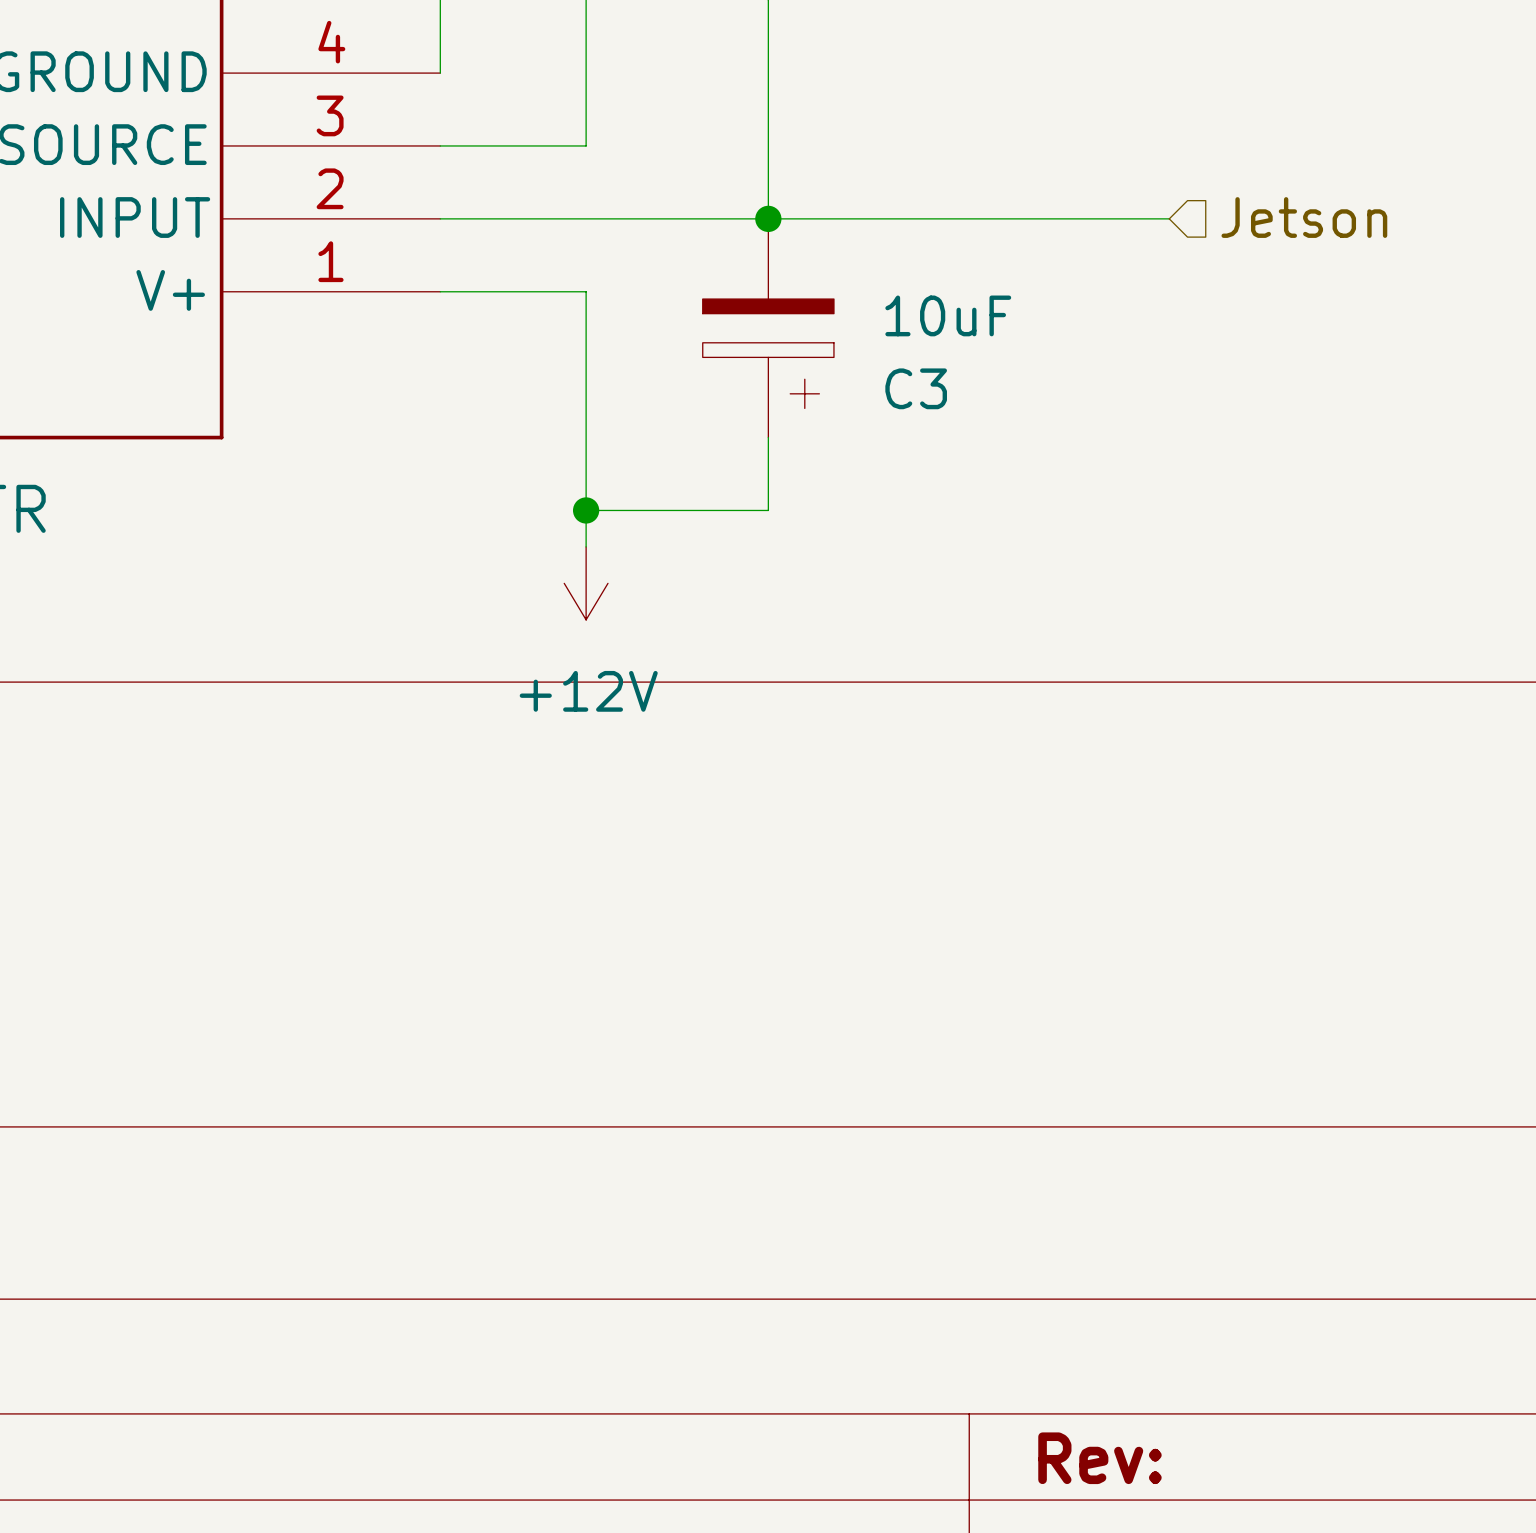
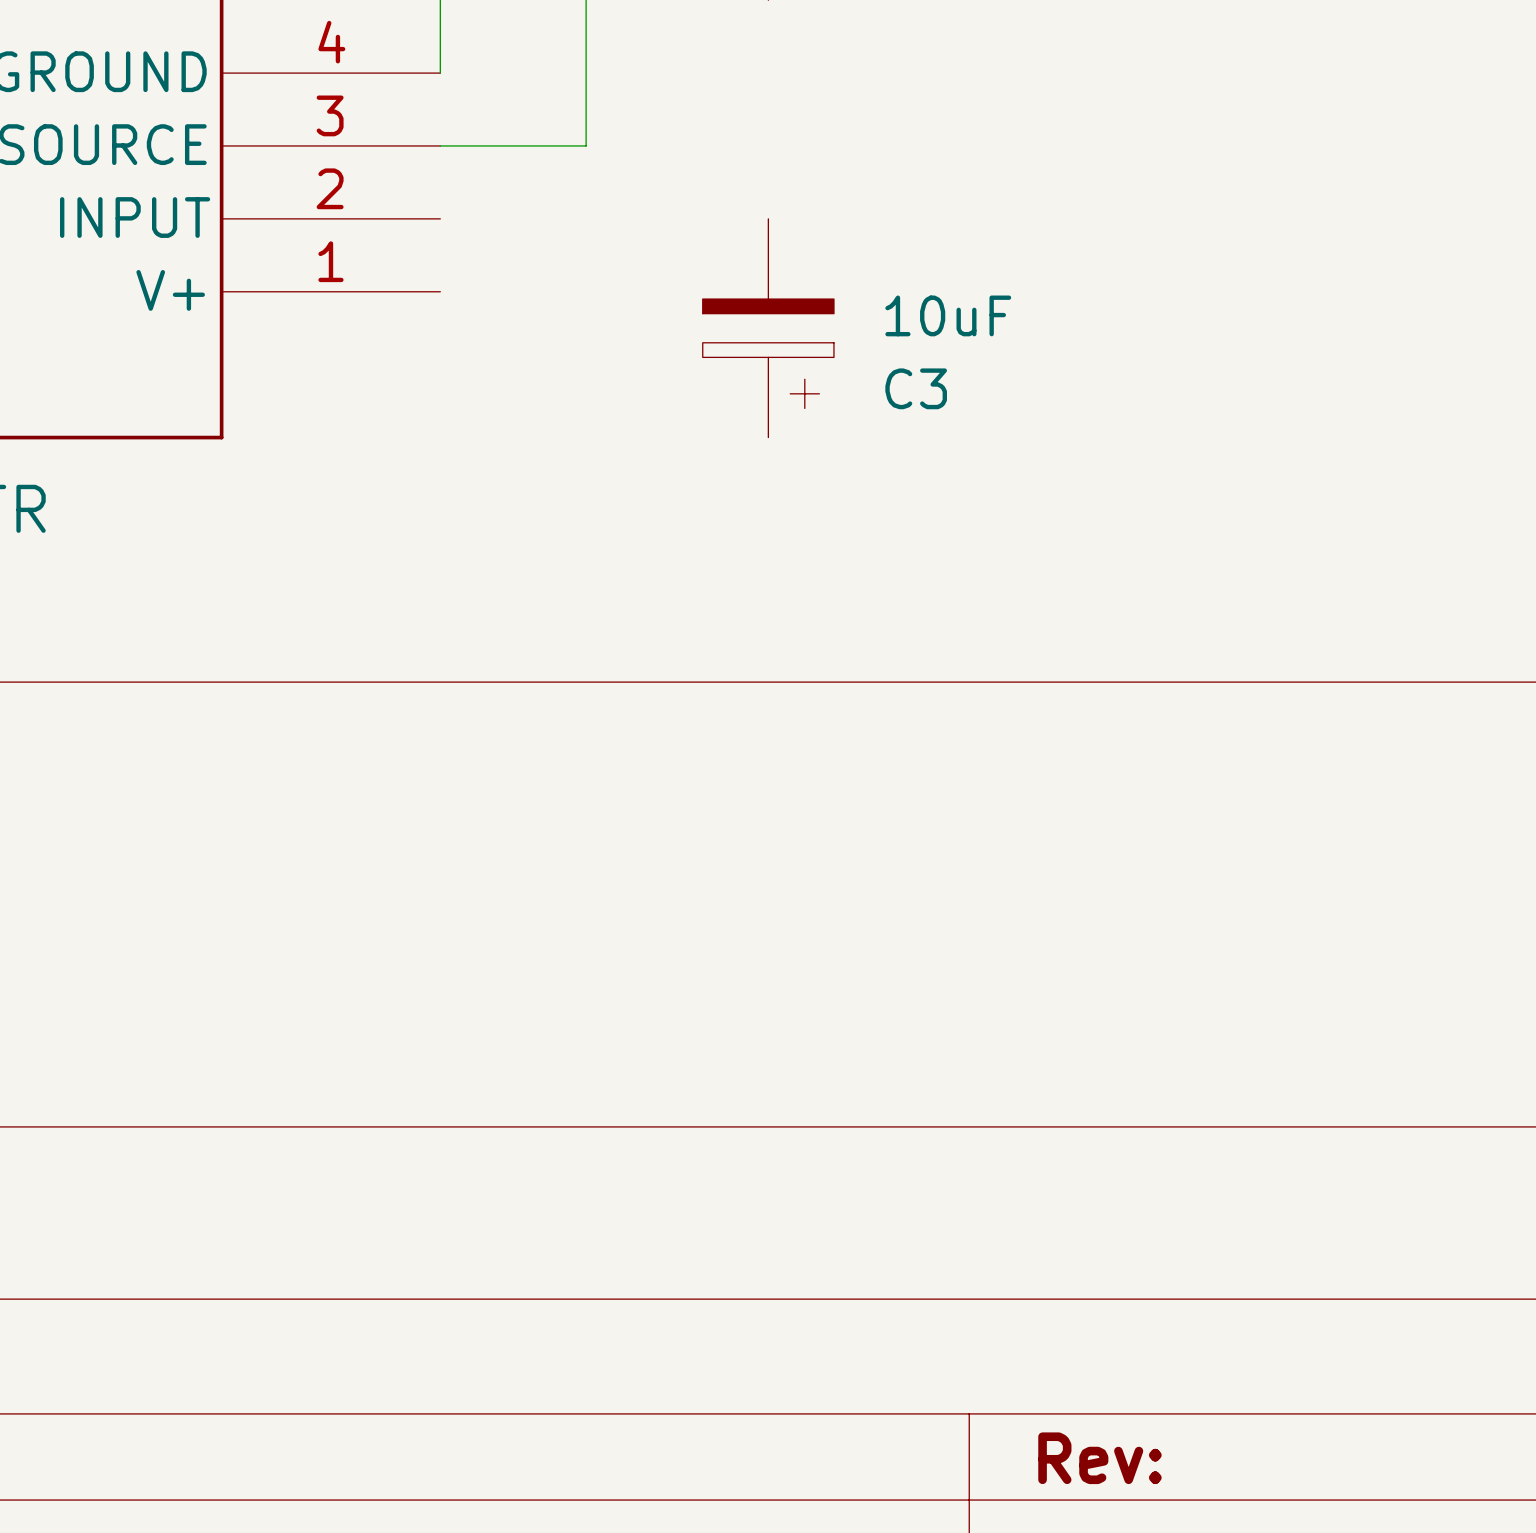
wire: (768, 0) (768, 218) -> none
hierarchical label: Jetson (1304, 217) -> none
wire: (440, 218) (1169, 218) -> none
junction: (768, 218) -> none
wire: (440, 291) (586, 291) (586, 546) -> none
wire: (768, 437) (768, 510) (586, 510) -> none
junction: (586, 510) -> none
power symbol: +12V (586, 583) -> none

